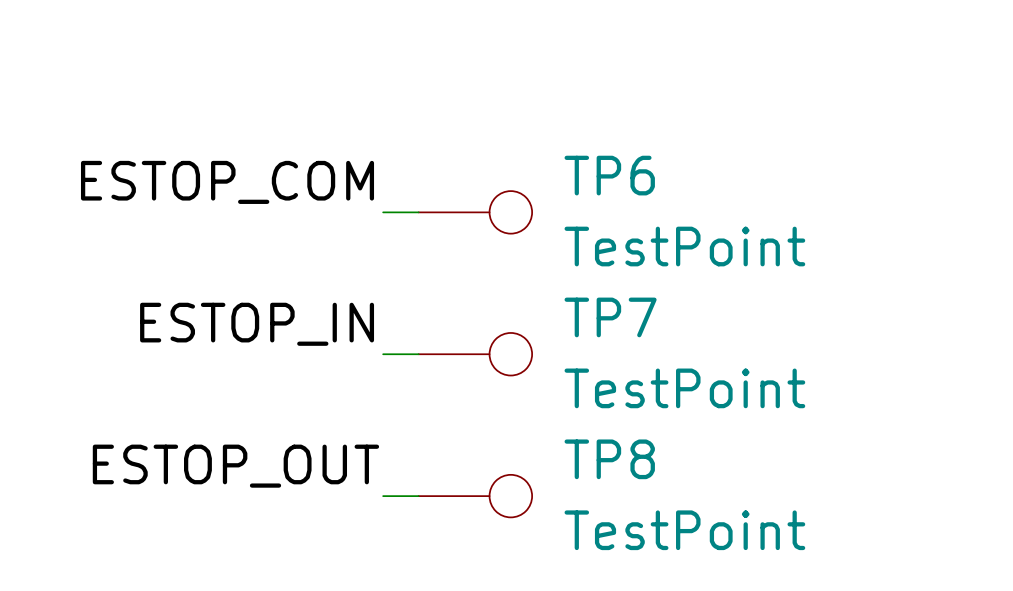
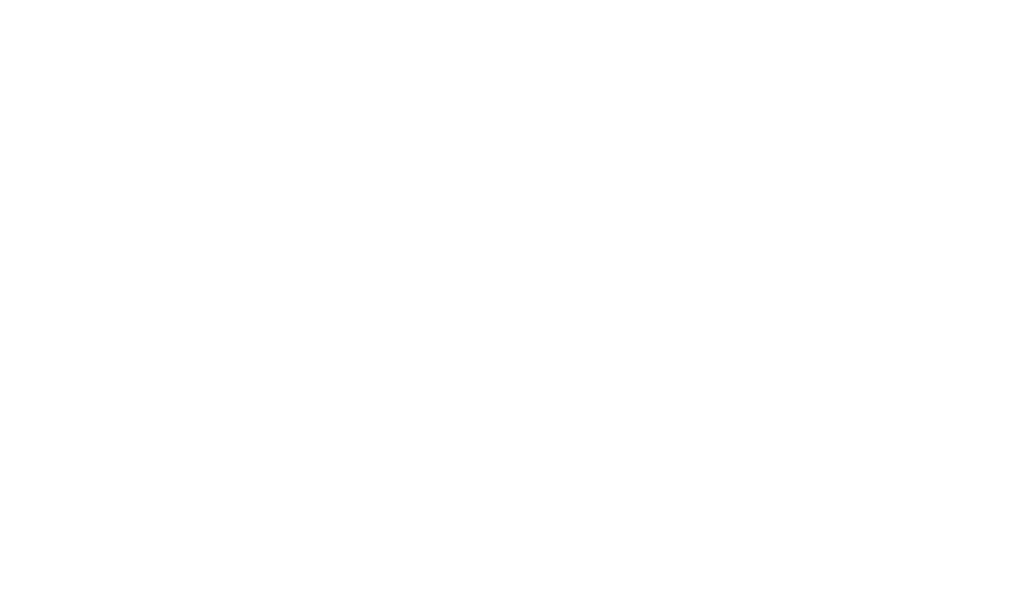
label: ESTOP_COM (227, 182) -> none
wire: (383, 212) (418, 212) -> none
TP6: TestPoint (475, 212) -> none
label: ESTOP_IN (257, 324) -> none
wire: (383, 354) (418, 354) -> none
TP7: TestPoint (475, 354) -> none
label: ESTOP_OUT (235, 466) -> none
wire: (383, 496) (418, 496) -> none
TP8: TestPoint (475, 496) -> none

